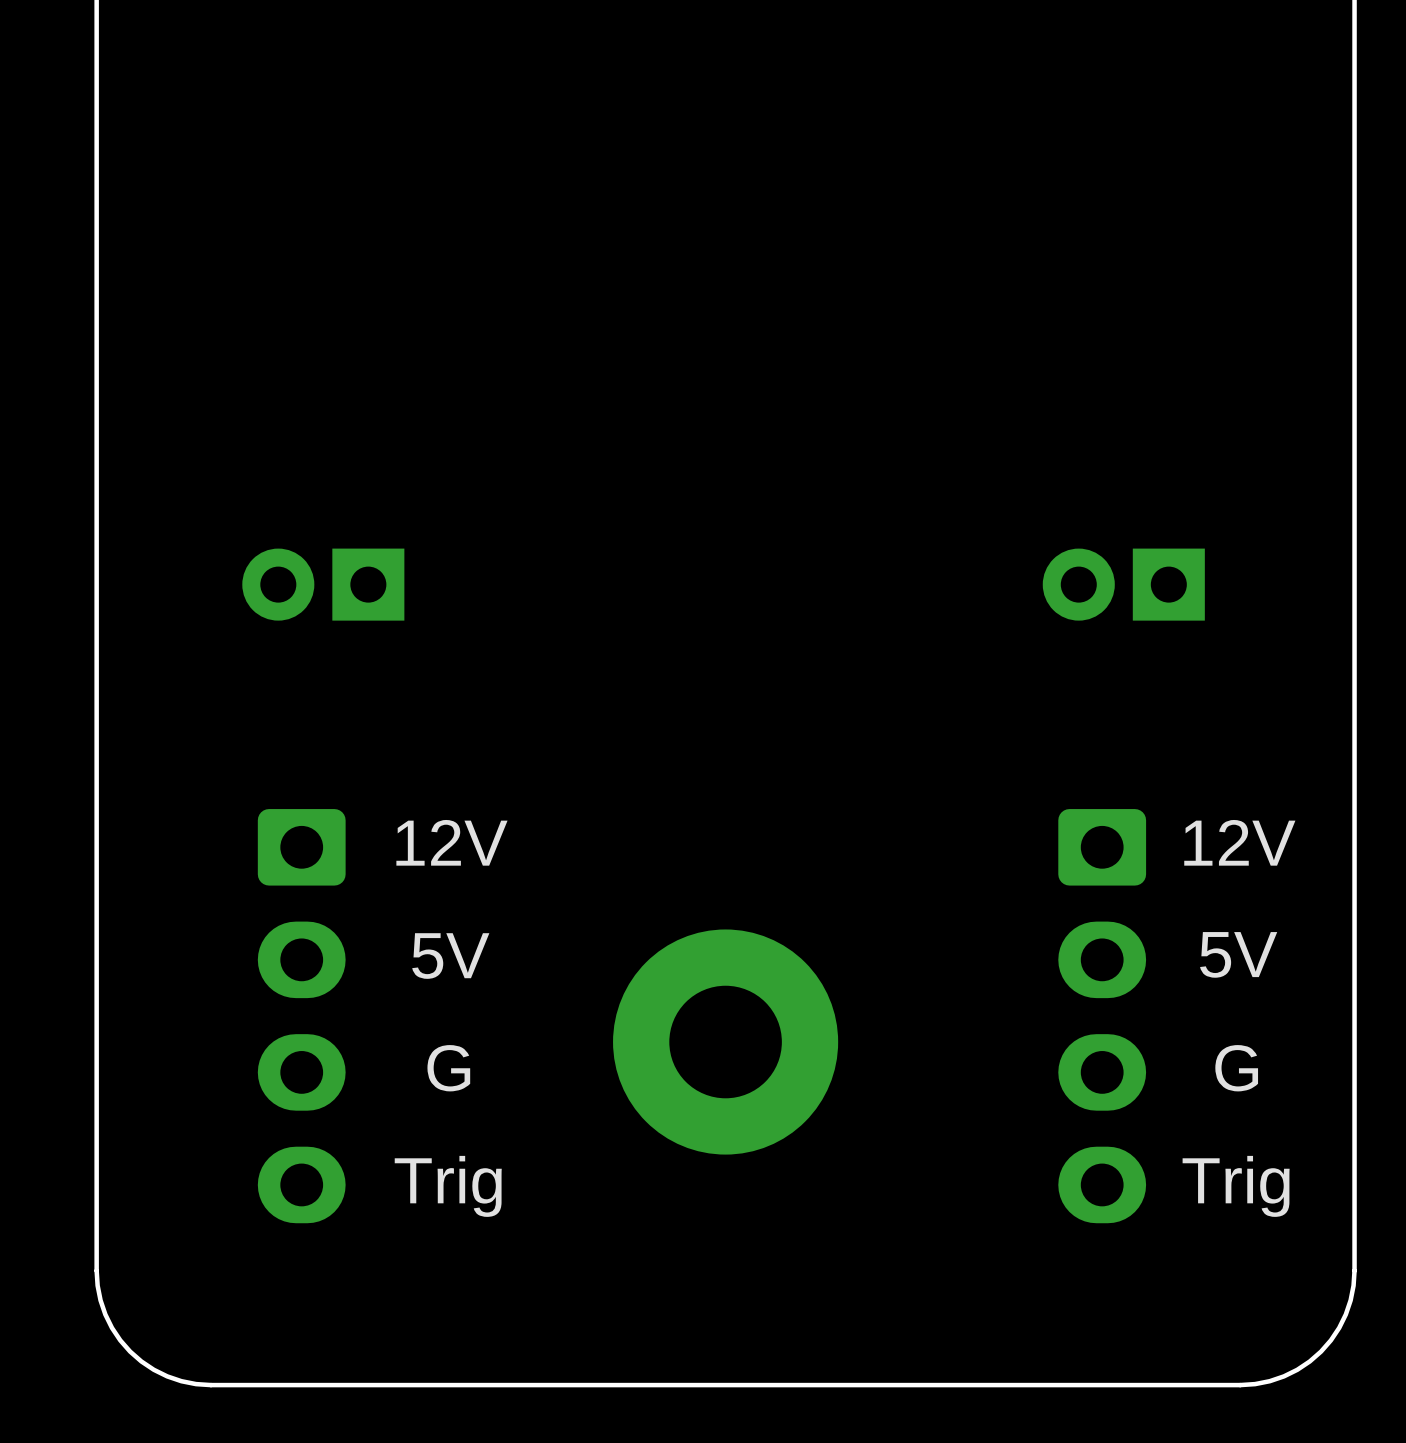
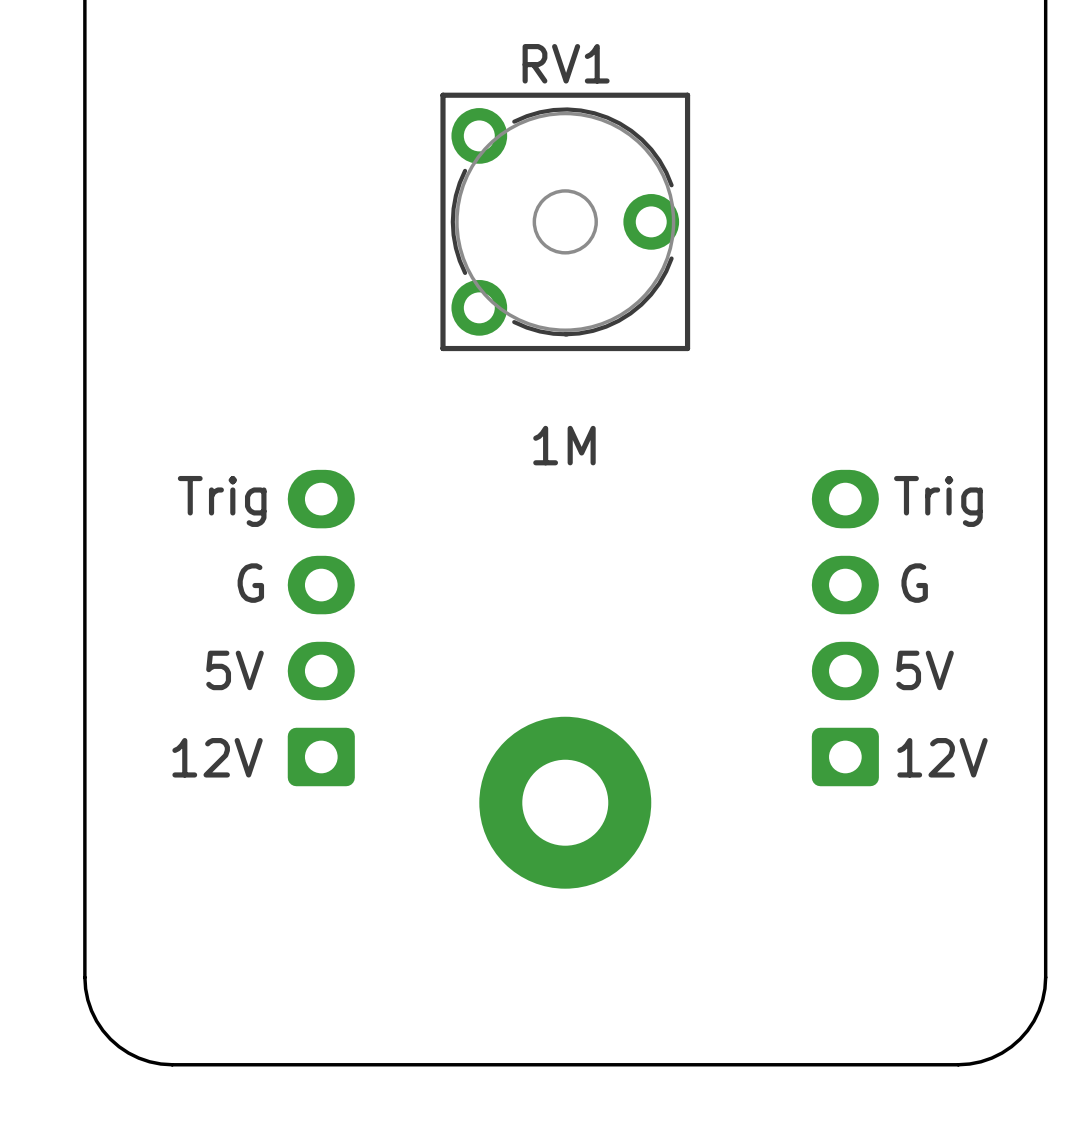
line: none -> (687, 95) (442, 95) (442, 348) (687, 348) (687, 95)
RV1: none -> (564, 221)
text: none -> 1M (564, 445)
part: (323, 584) -> none
part: (1123, 584) -> none
text: none -> Trig (222, 501)
text: none -> Trig (938, 501)
text position: 12V (451, 842) -> 12V (217, 757)
text position: 12V (1239, 842) -> 12V (942, 757)
text position: 5V (1238, 954) -> 5V (925, 670)
text position: 5V (450, 956) -> 5V (235, 670)
part rotation: 0° (301, 1016) -> 180° (321, 628)
part rotation: 0° (1102, 1016) -> 180° (845, 628)
text position: G (448, 1068) -> G (250, 583)
text position: G (1236, 1068) -> G (914, 583)
text: Trig (448, 1186) -> none
text: Trig (1236, 1186) -> none

